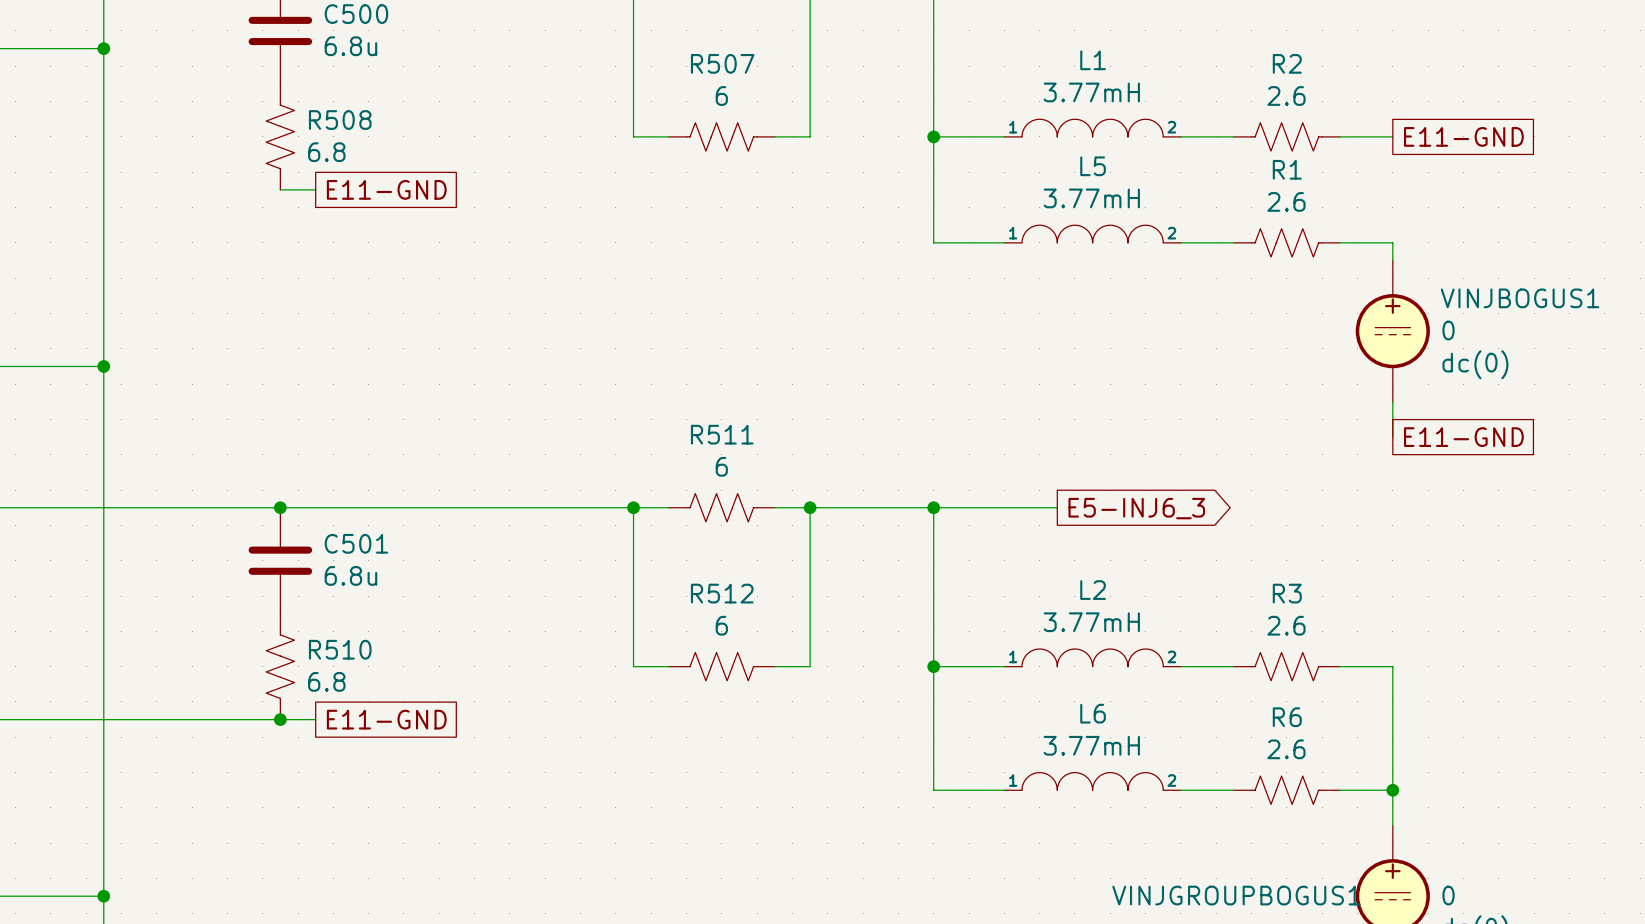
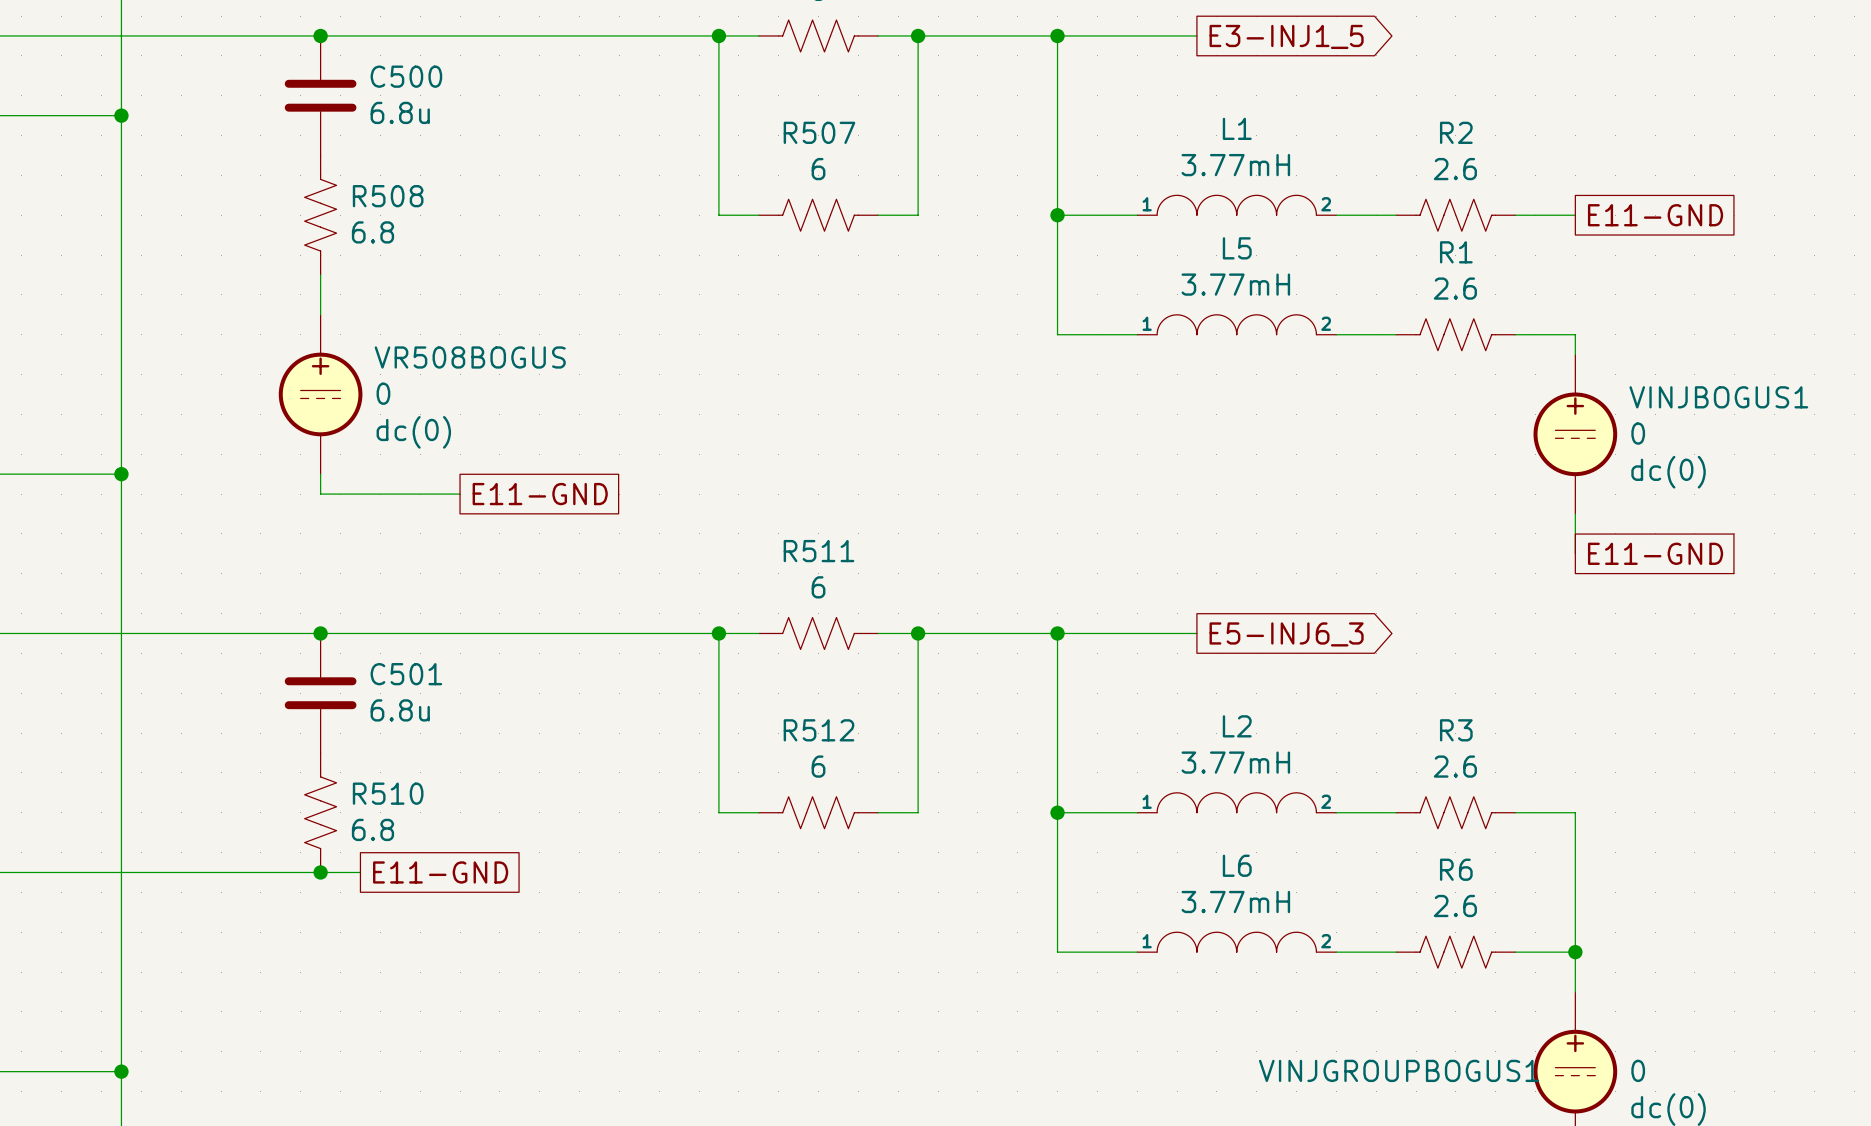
wire: (280, 189) (315, 189) -> (320, 274) (320, 314)
global label position: E11-GND (386, 189) -> E11-GND (540, 494)
VR508BOGUS: none -> 0 (320, 394)
wire: none -> (320, 474) (320, 494) (460, 494)

